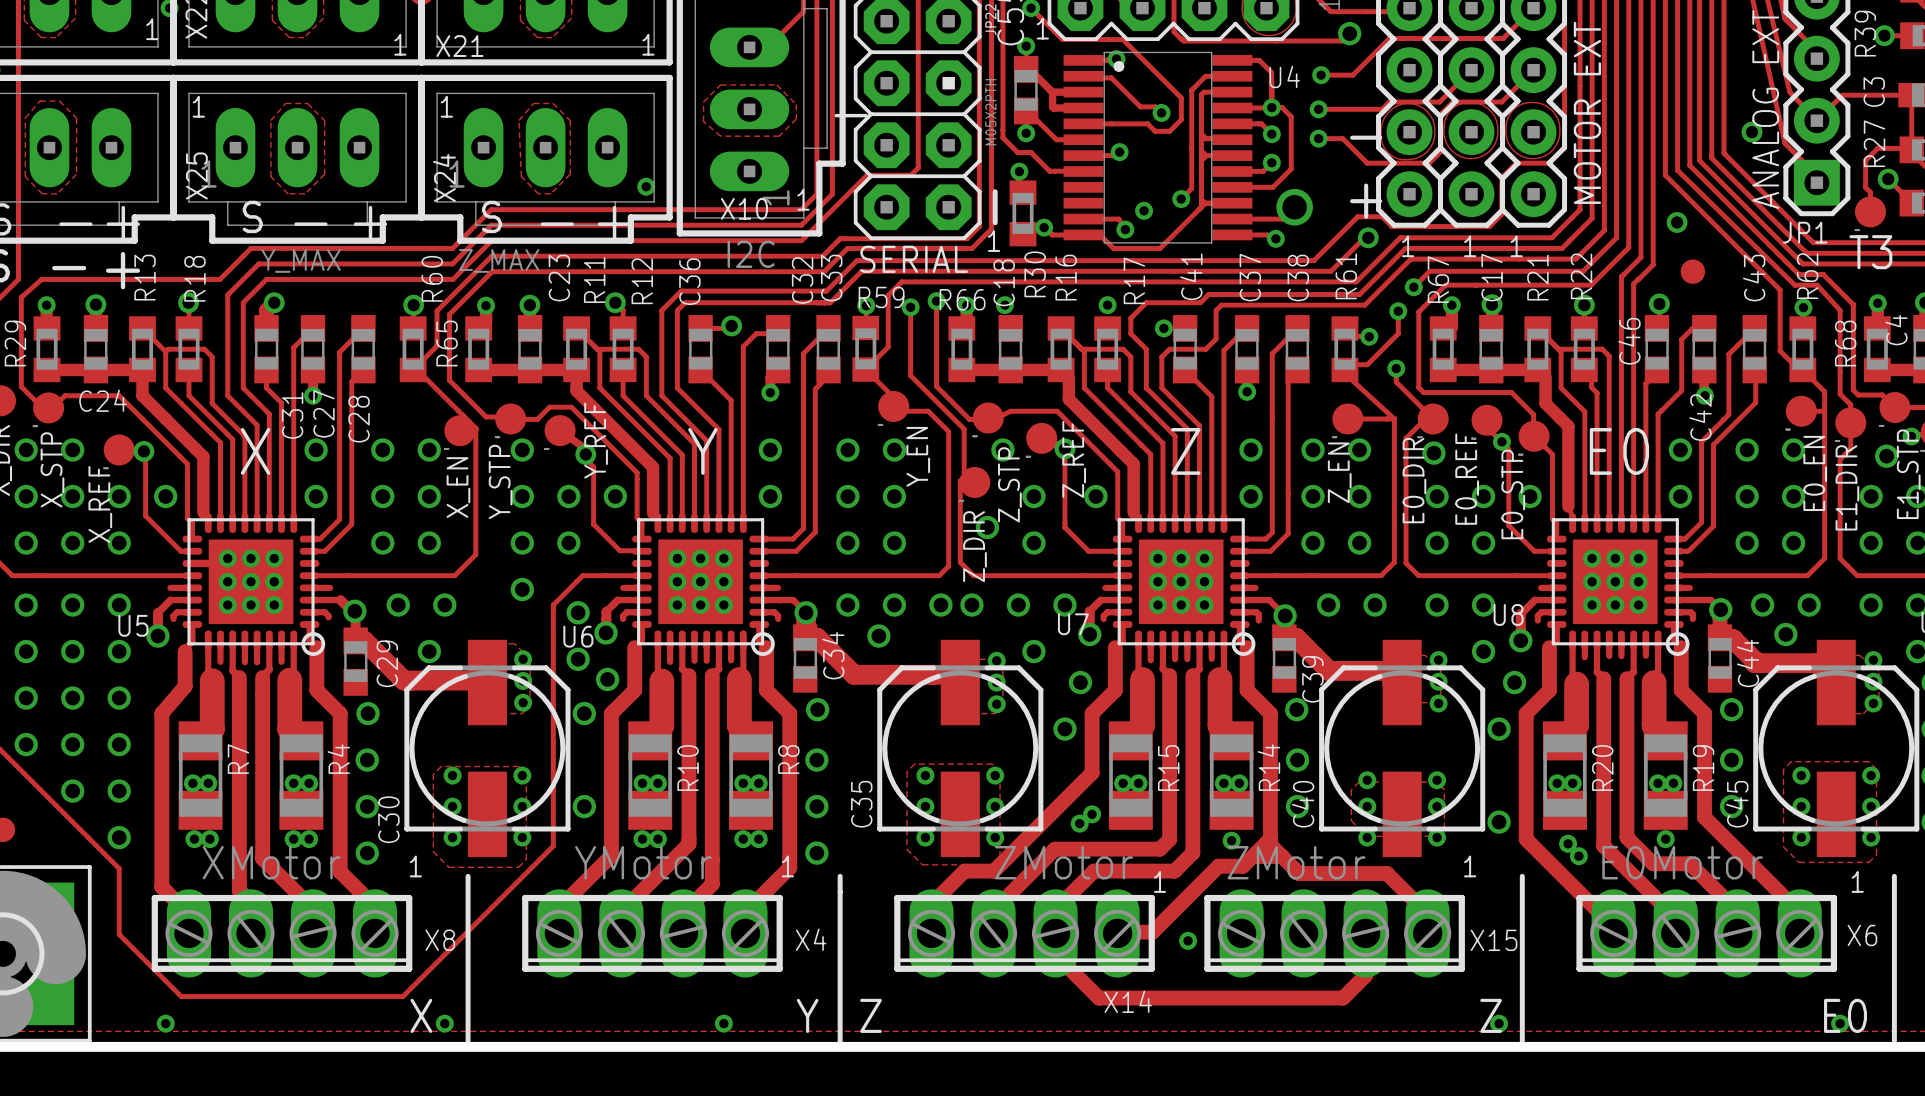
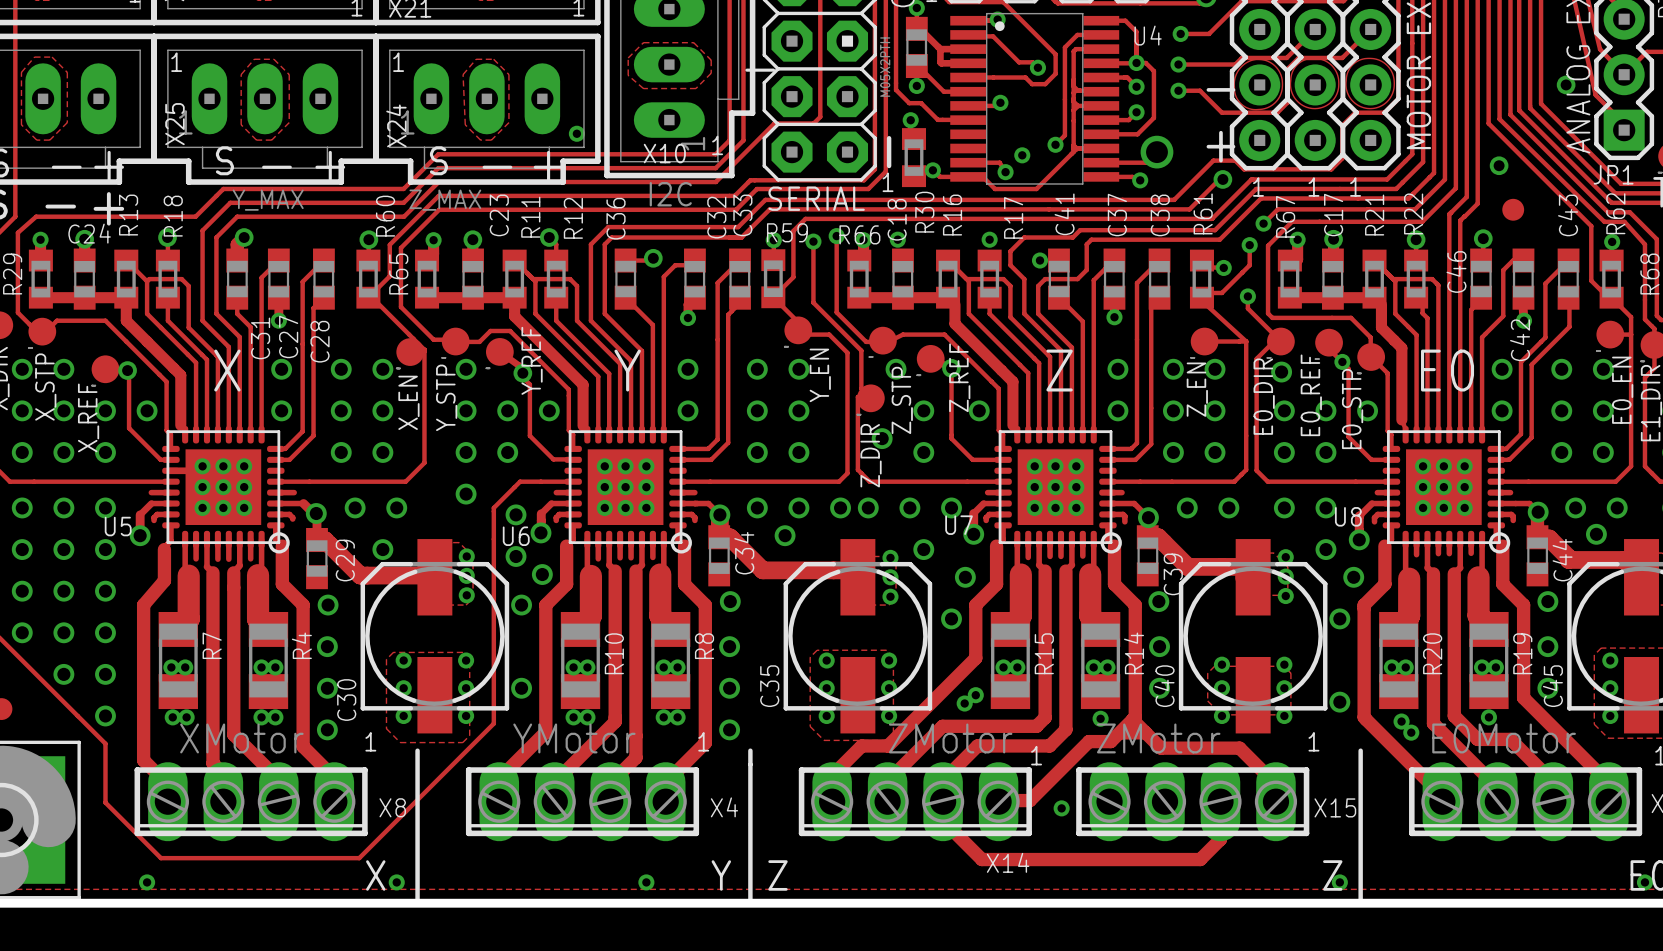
C24 name position: C24 (103, 400) -> C24 (89, 233)

